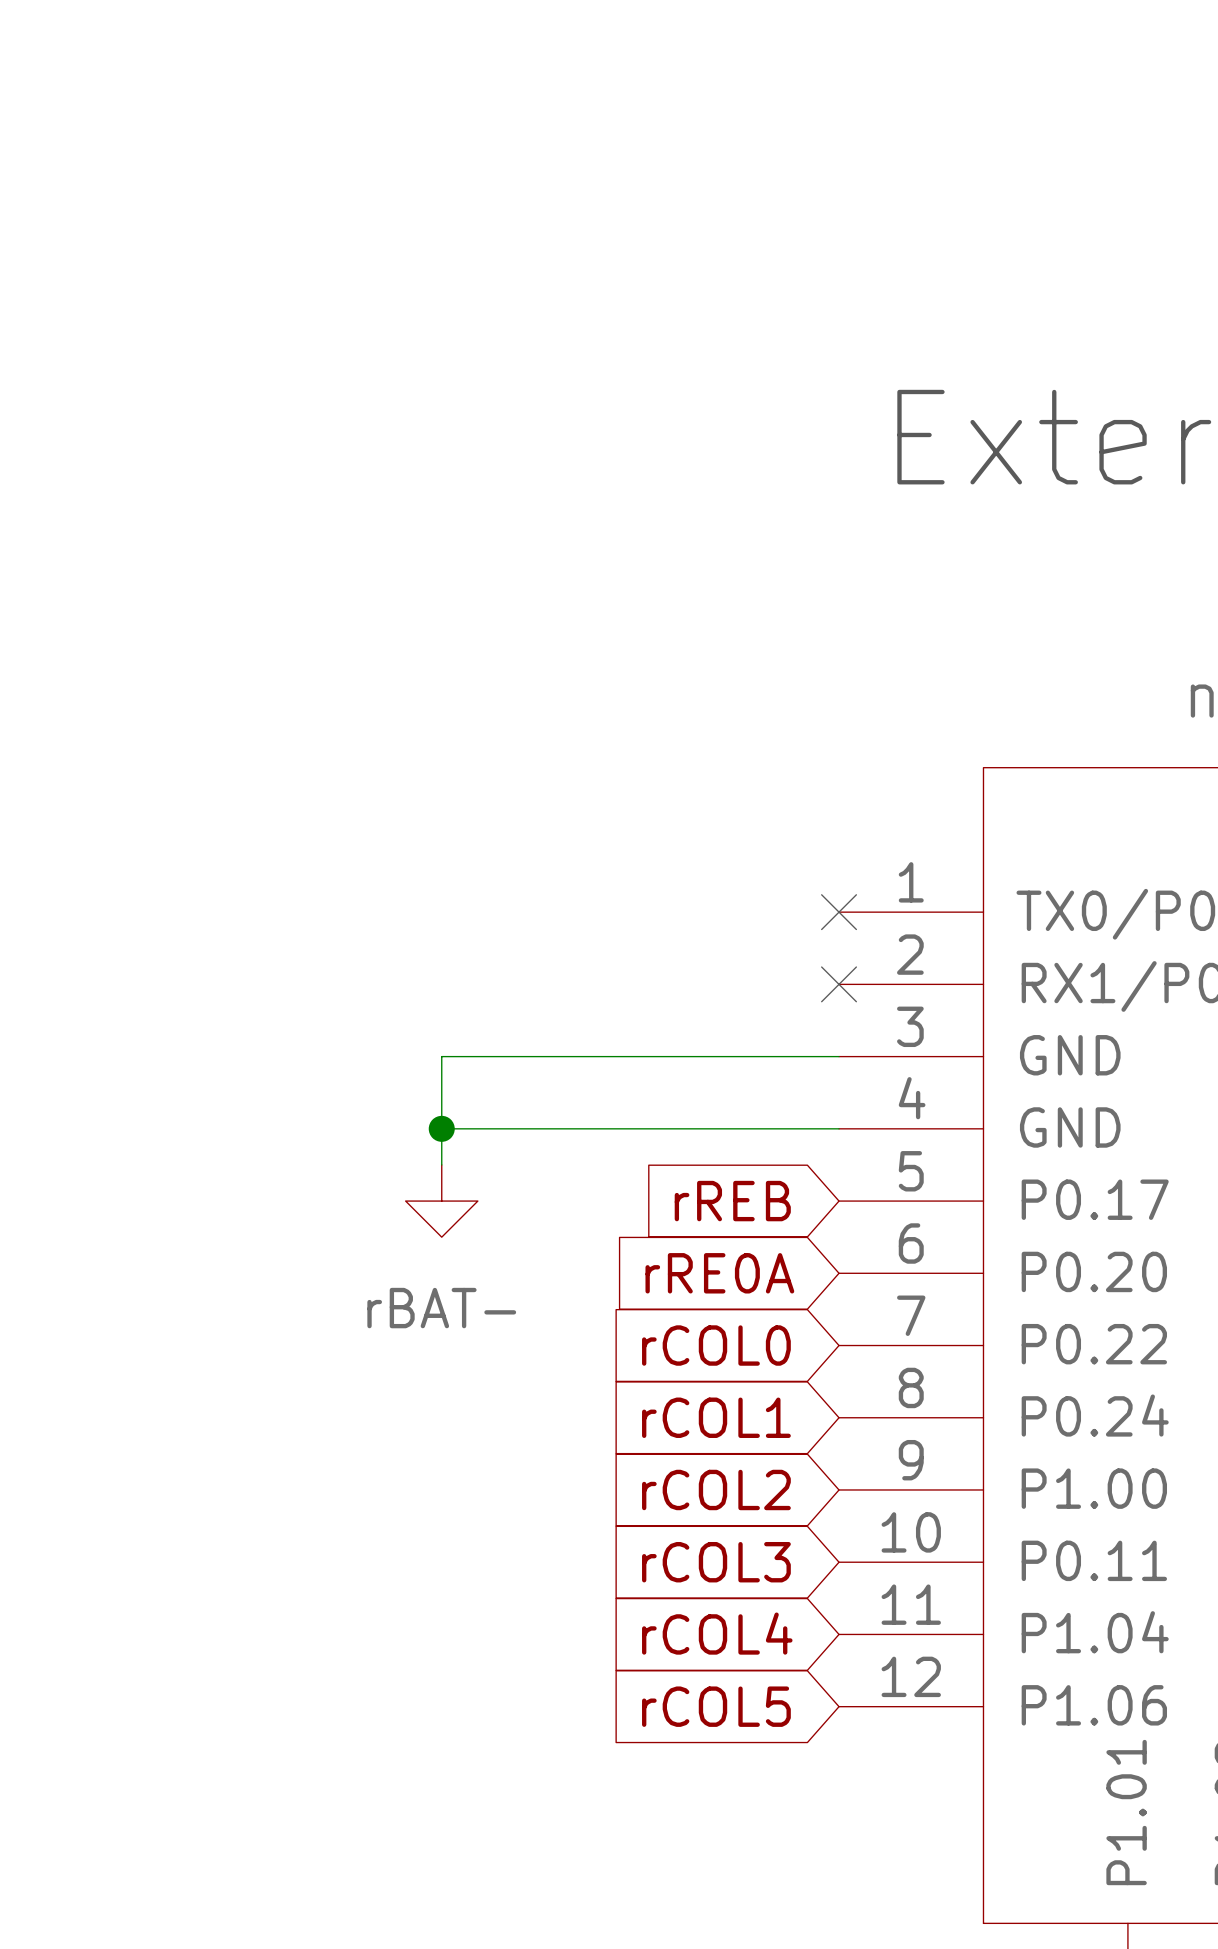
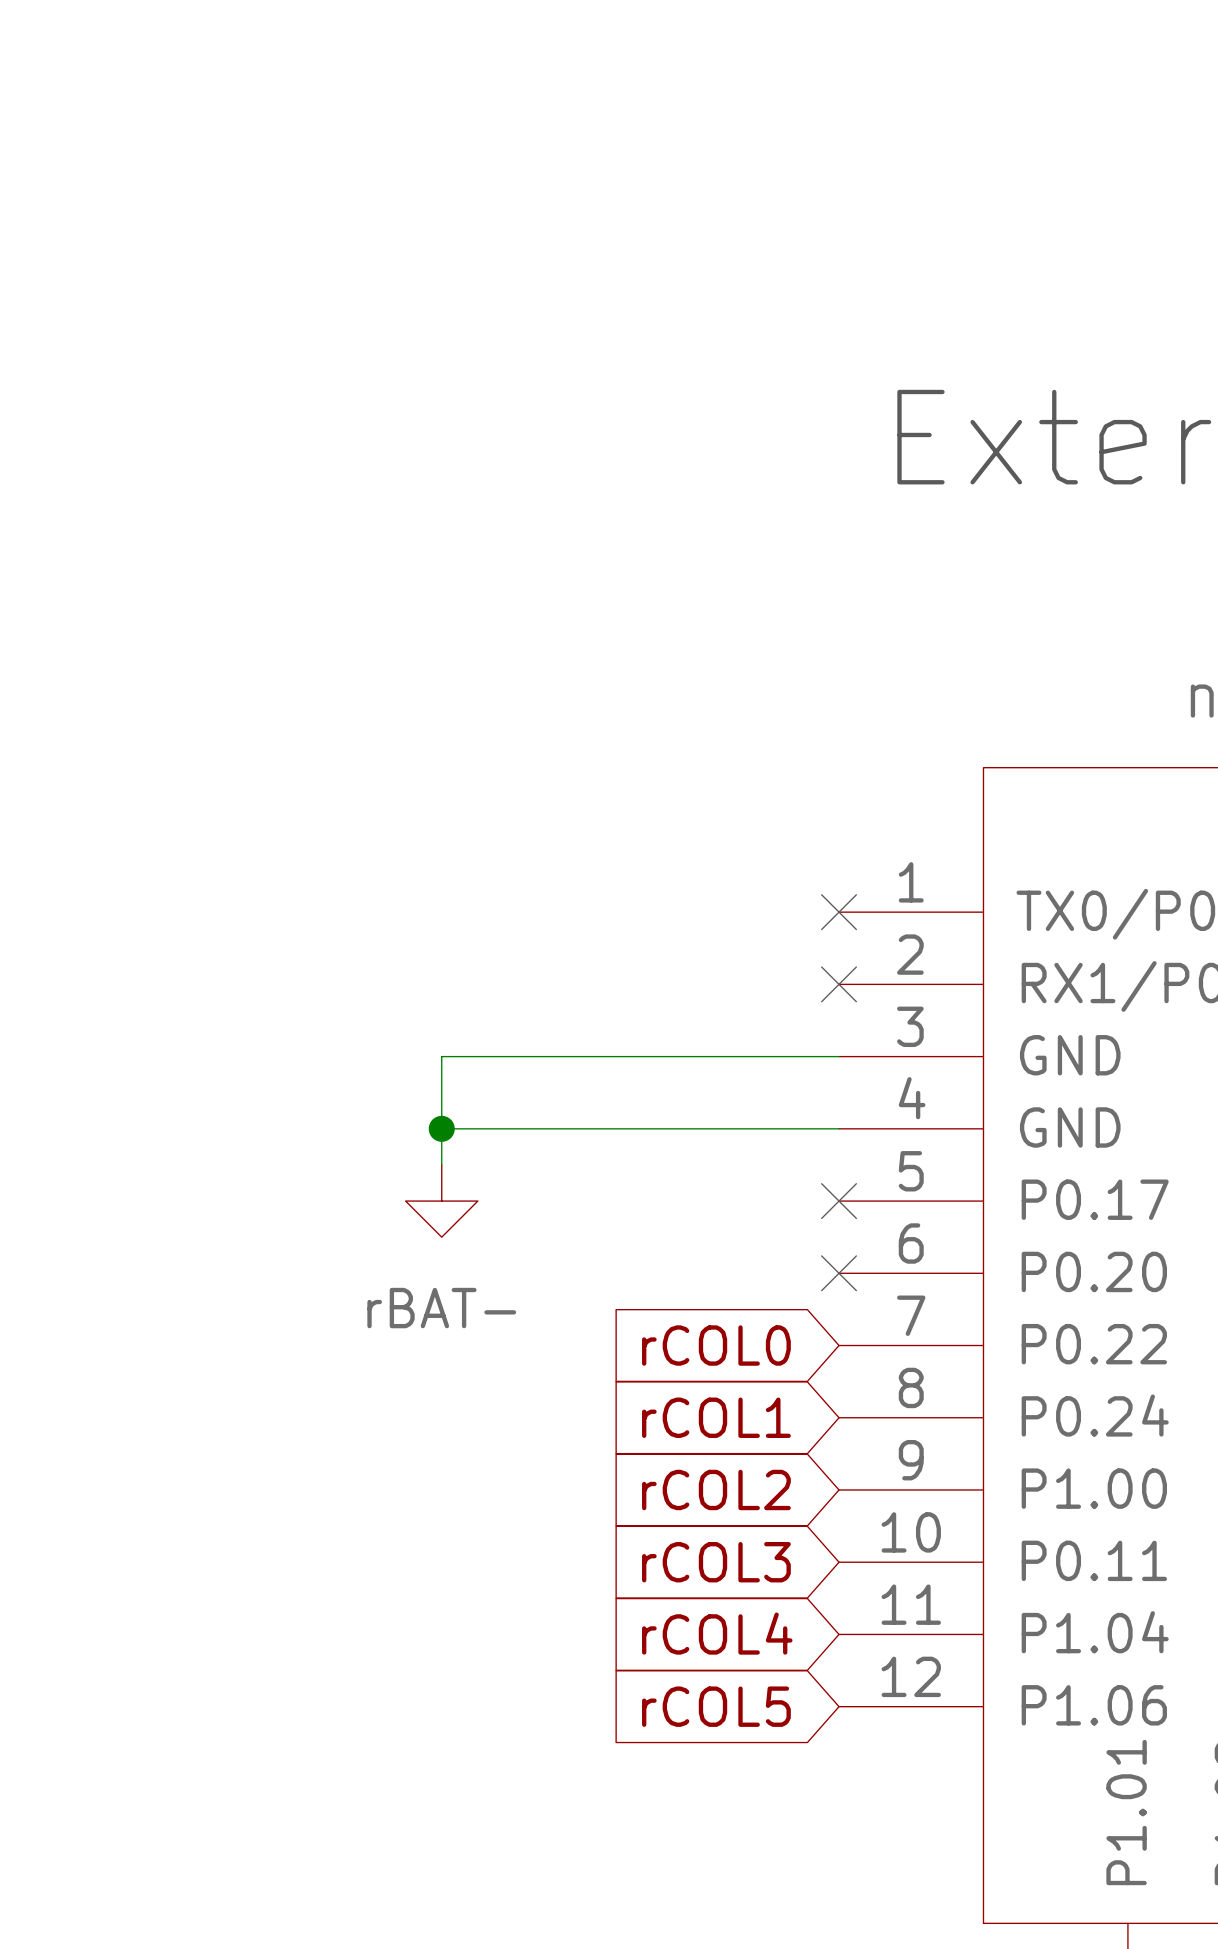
global label: rREB (732, 1201) -> none
no-connect mark: none -> (839, 1201)
global label: rRE0A (719, 1273) -> none
no-connect mark: none -> (839, 1273)

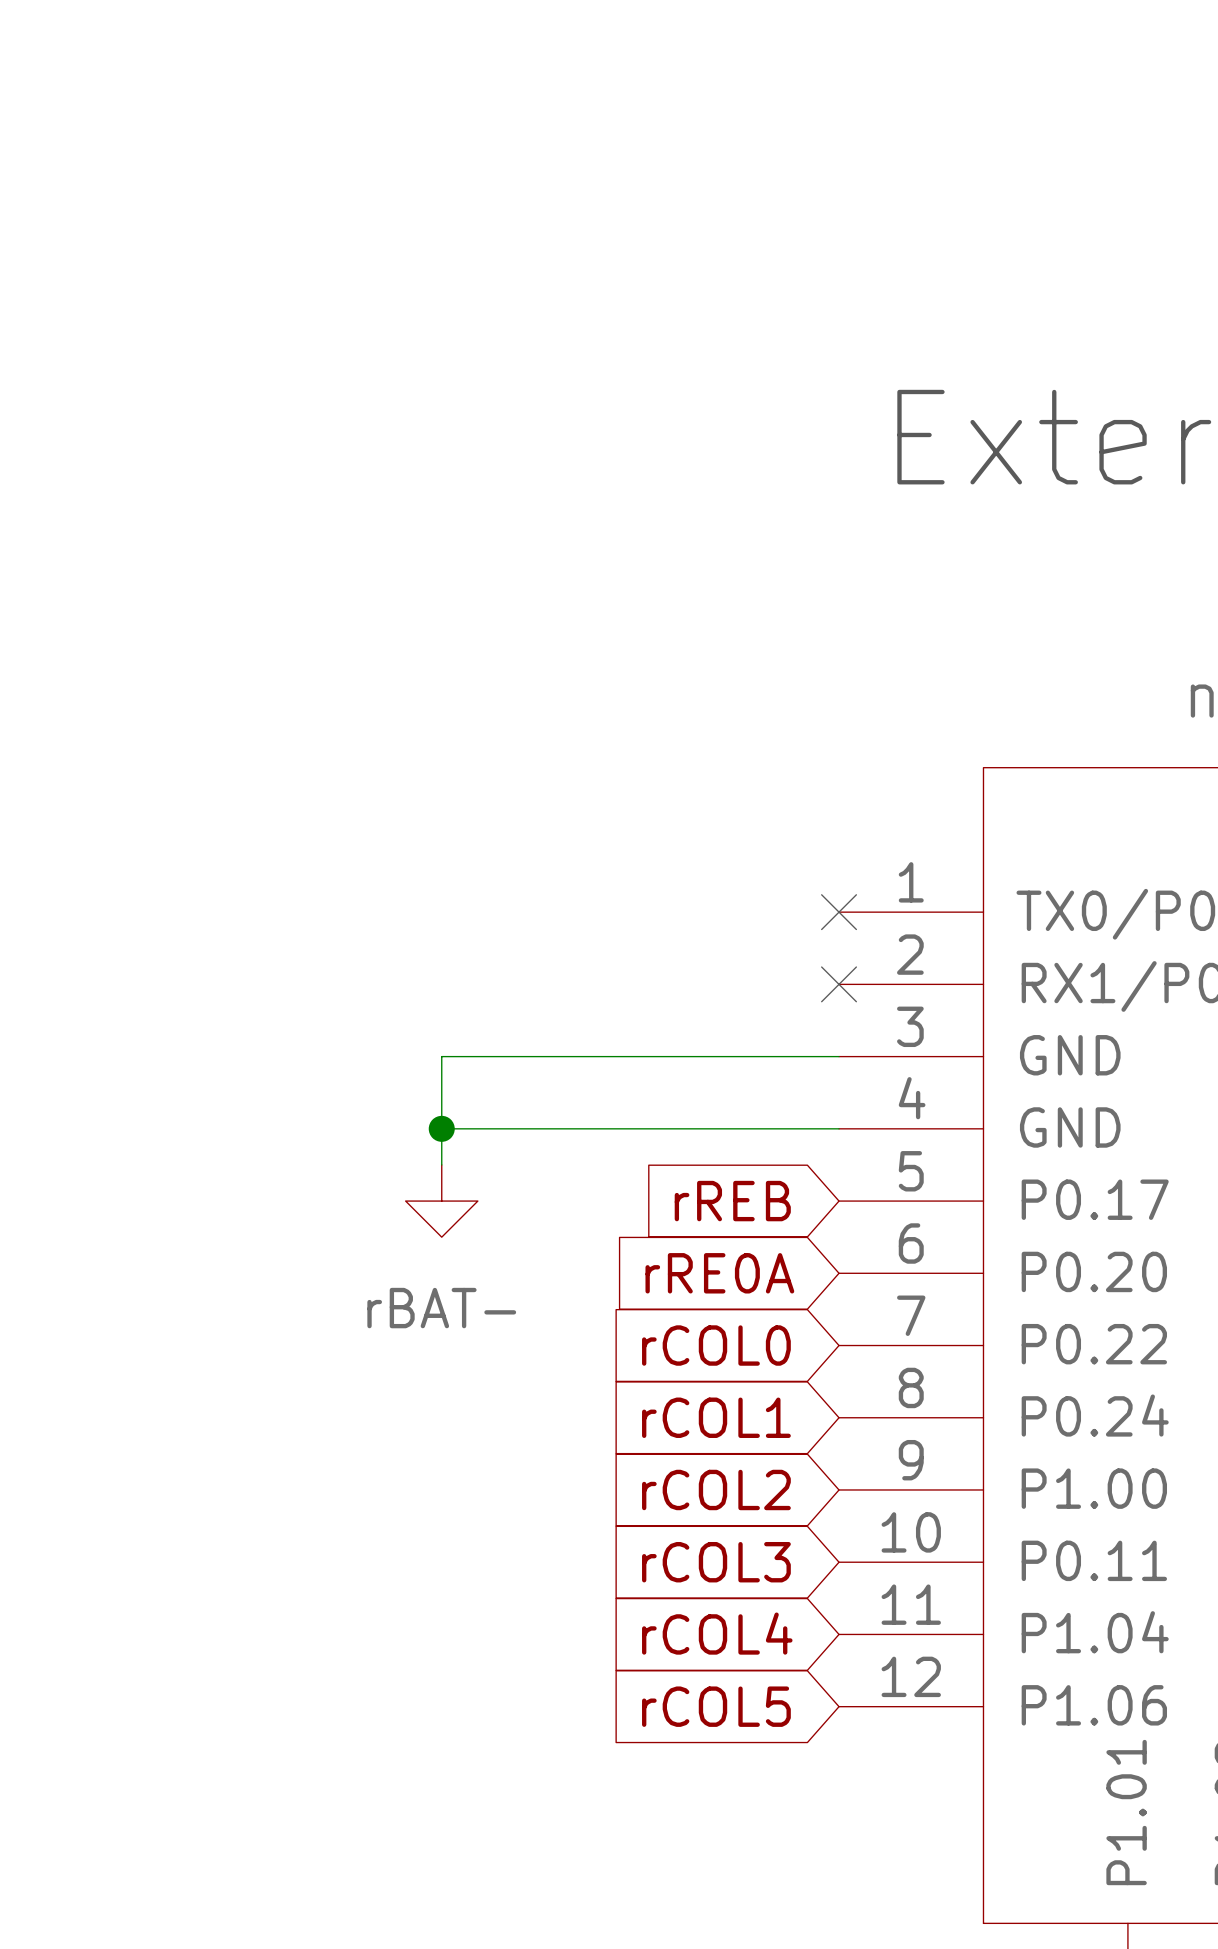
global label: none -> rREB (732, 1201)
no-connect mark: (839, 1201) -> none
global label: none -> rRE0A (719, 1273)
no-connect mark: (839, 1273) -> none

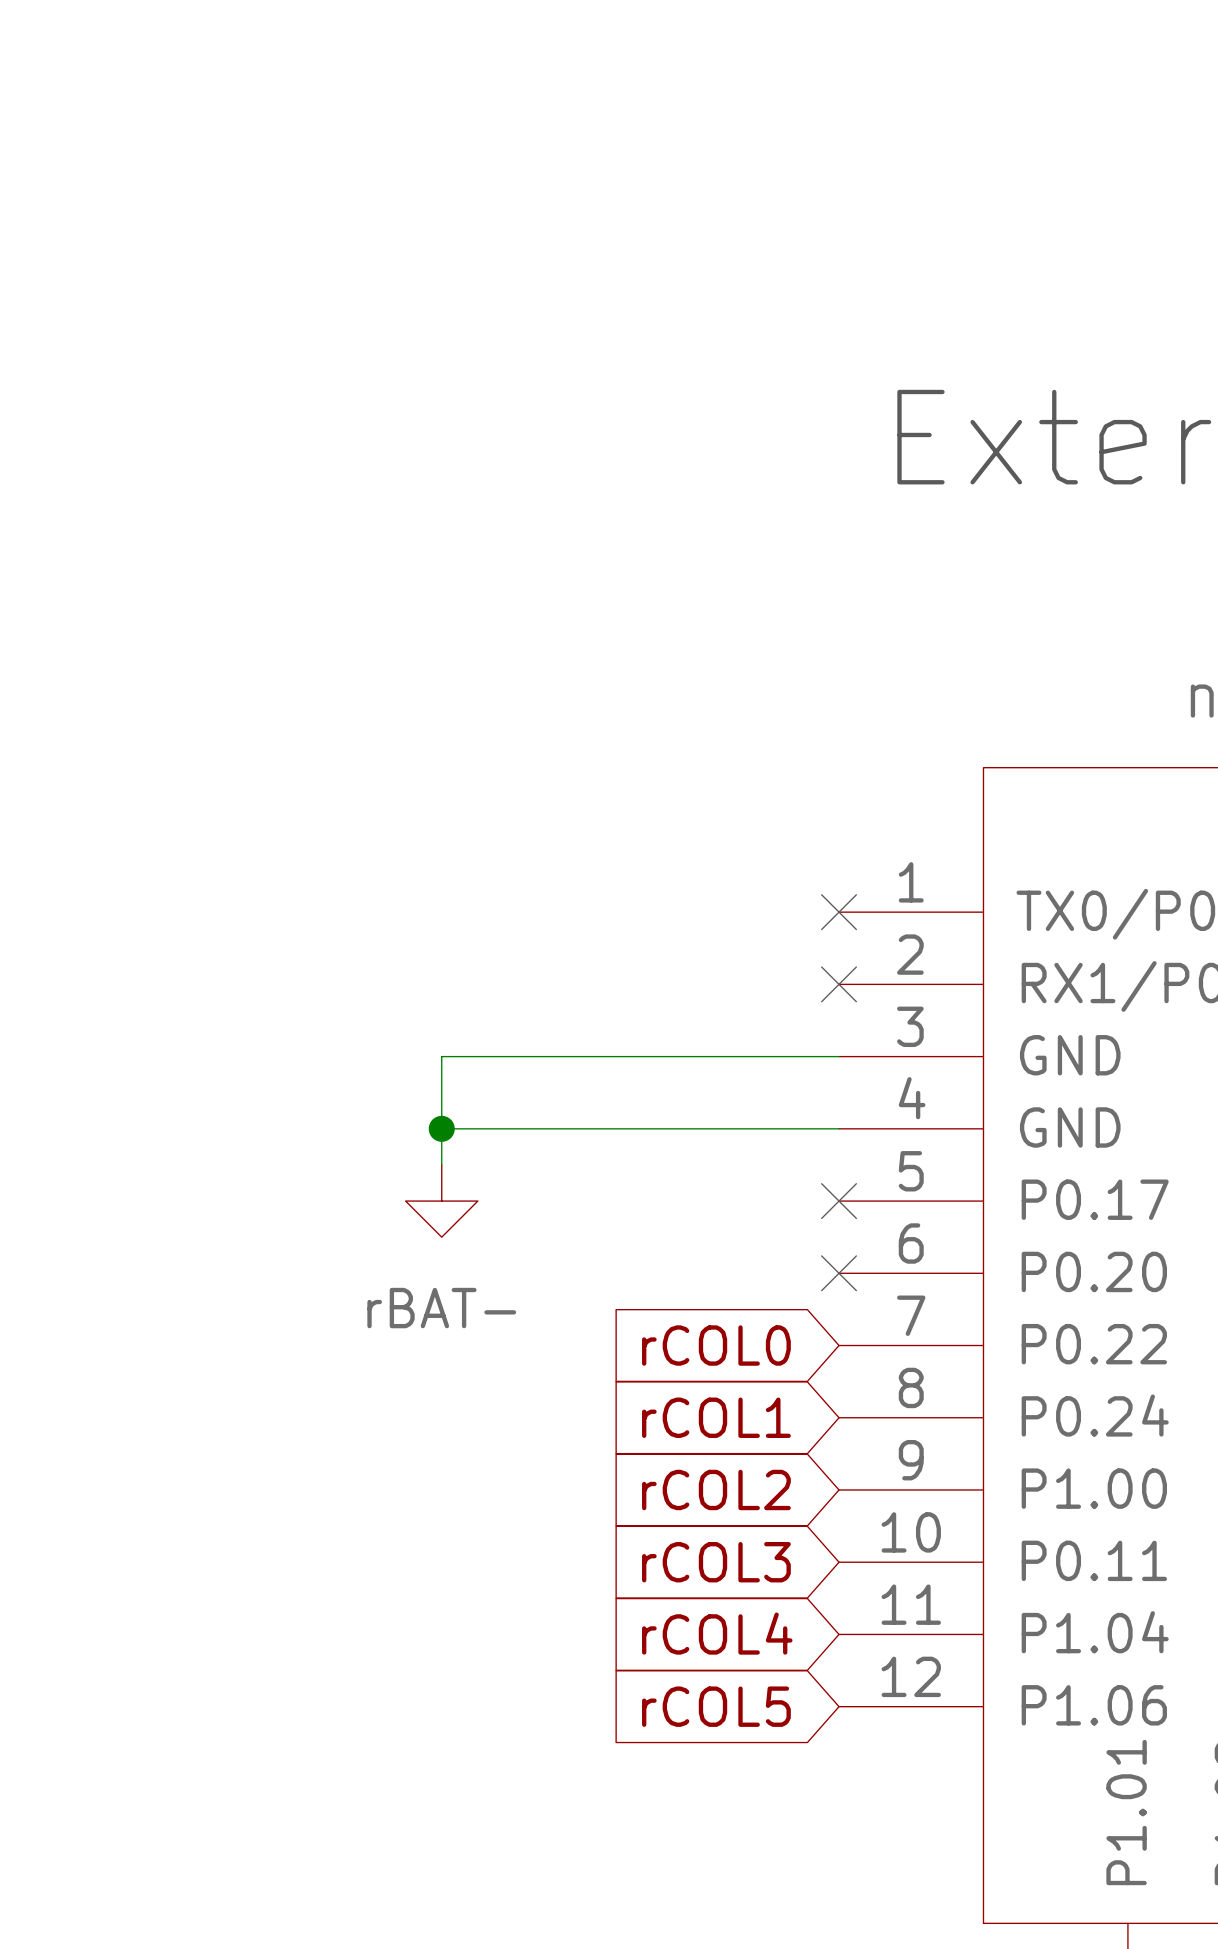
global label: rREB (732, 1201) -> none
no-connect mark: none -> (839, 1201)
global label: rRE0A (719, 1273) -> none
no-connect mark: none -> (839, 1273)

